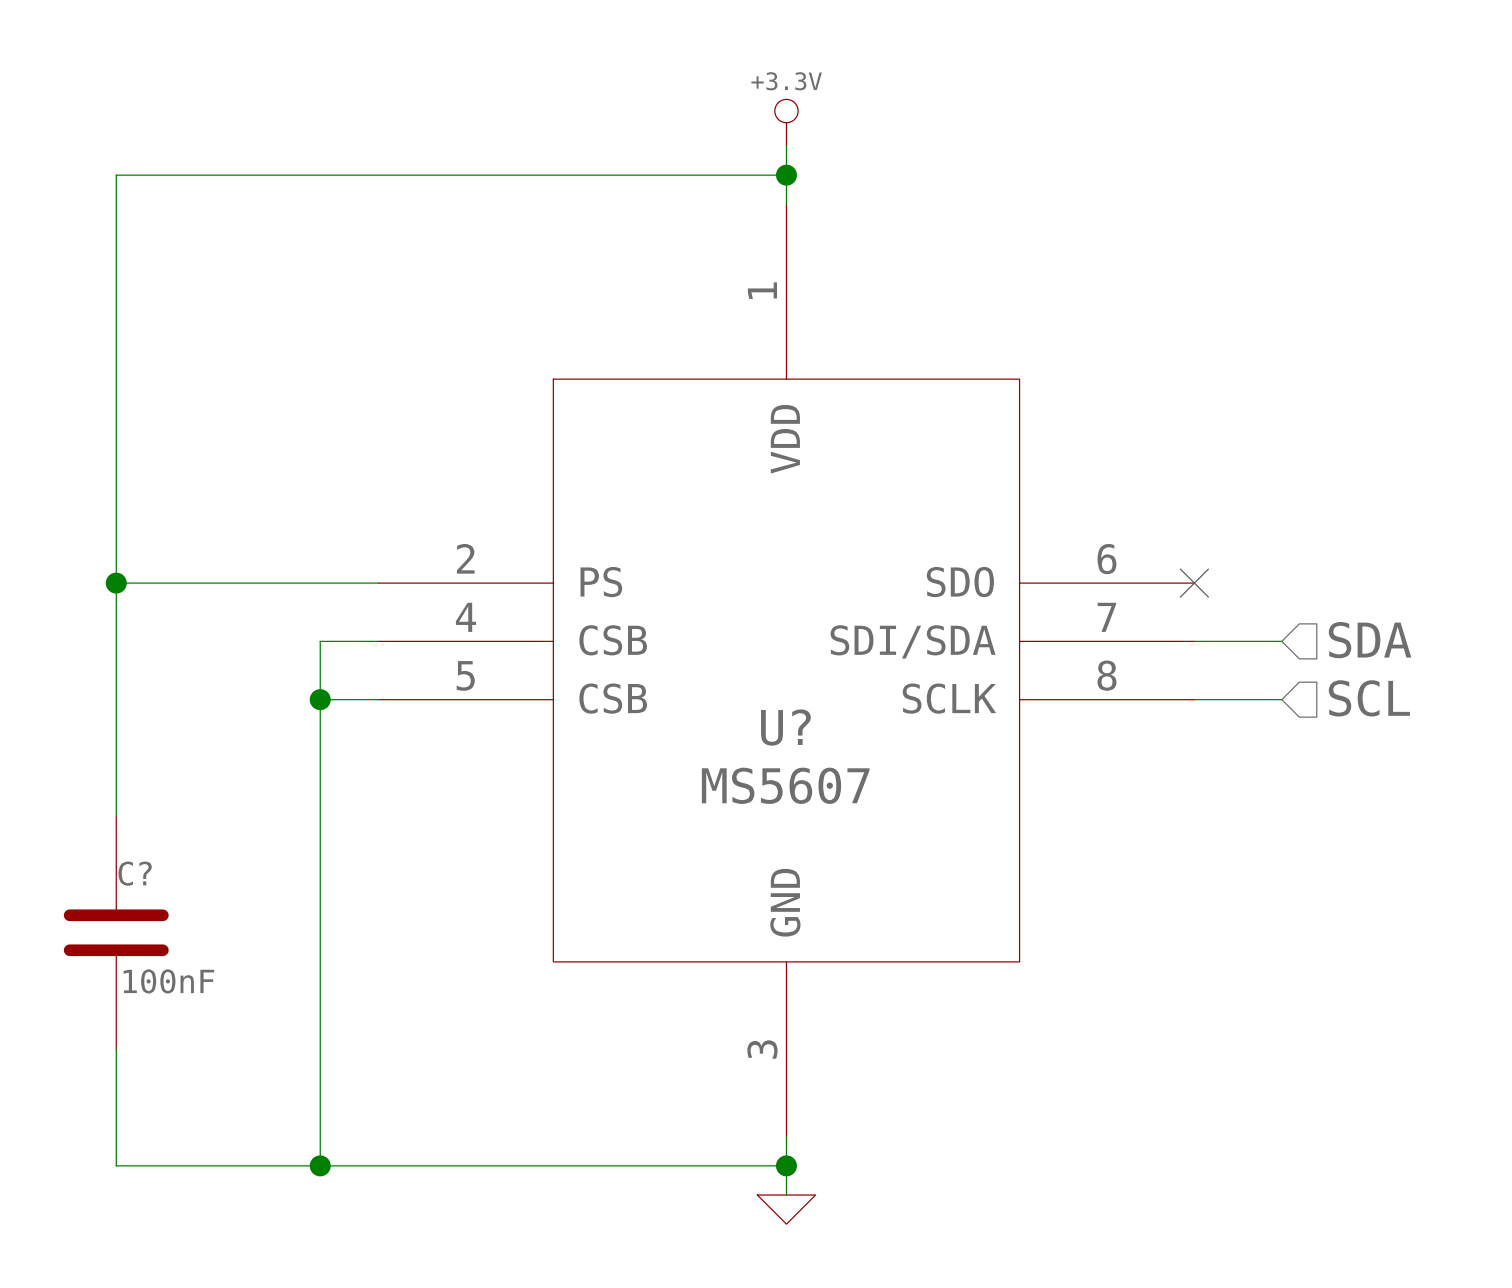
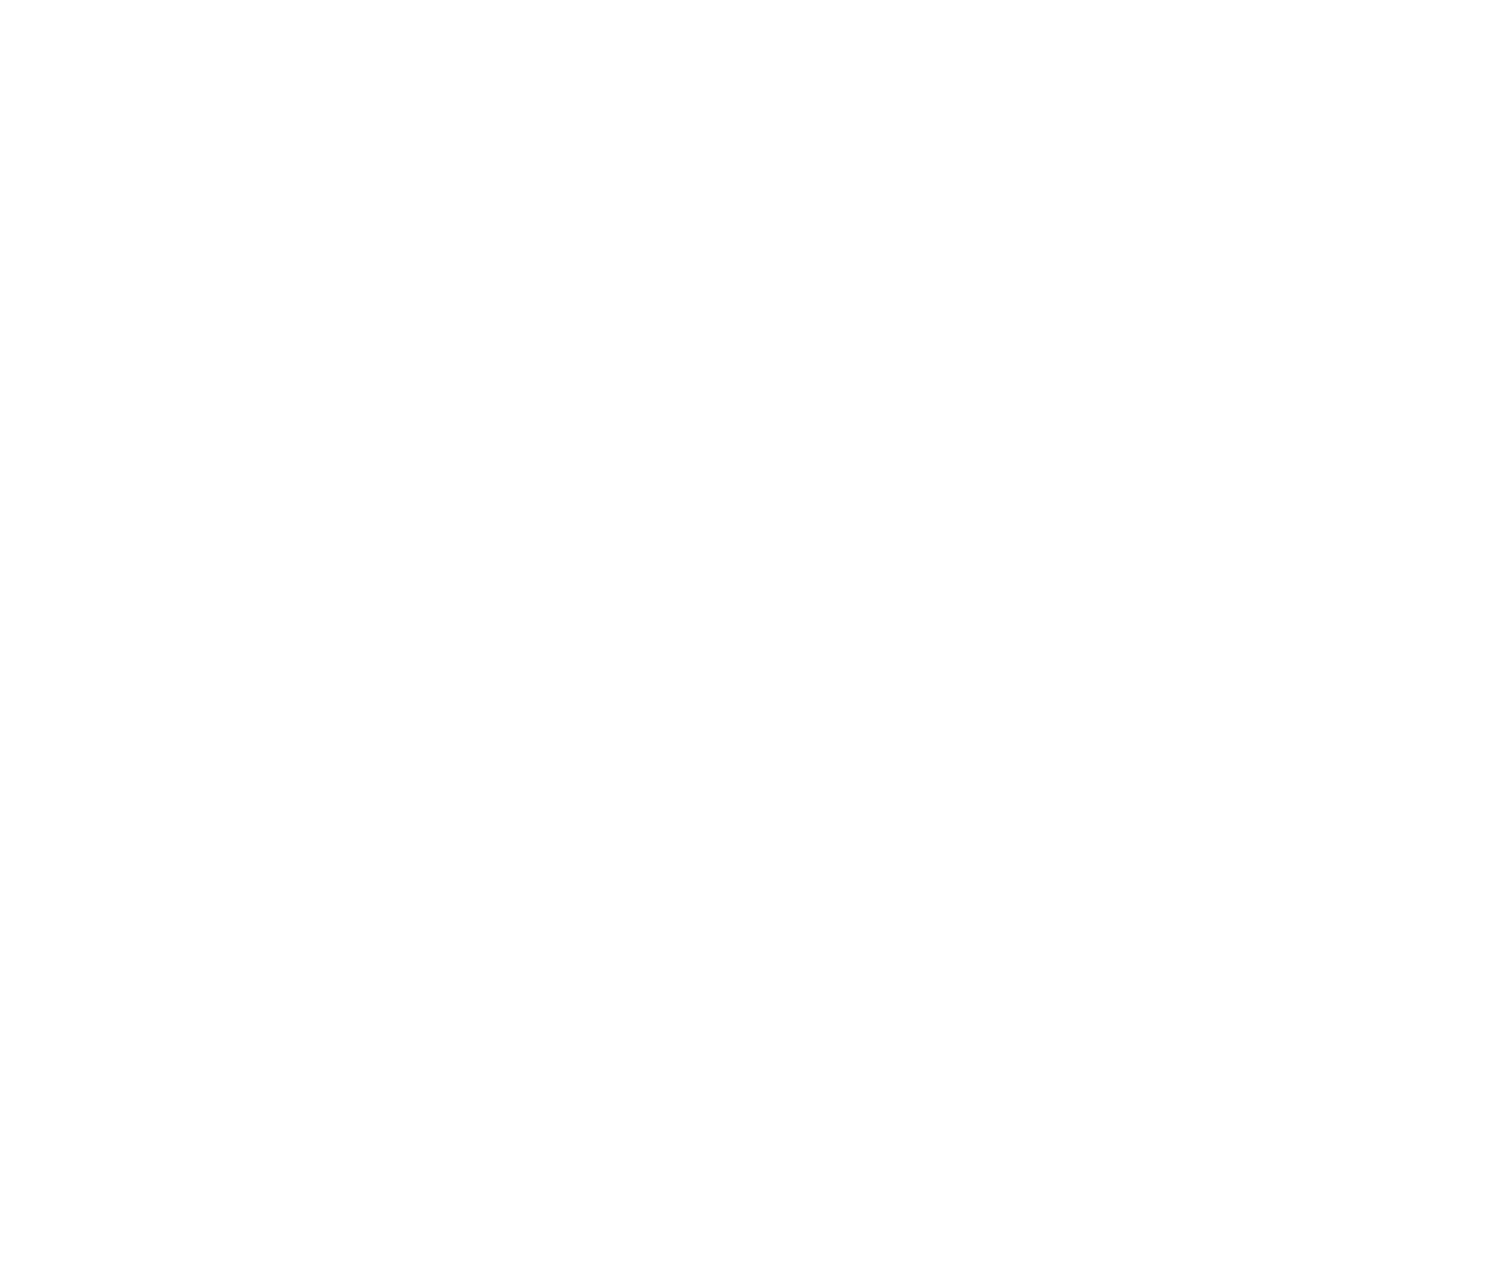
power symbol: +3.3V (786, 122) -> none
wire: (786, 146) (786, 204) -> none
wire: (786, 175) (116, 175) (116, 816) -> none
junction: (786, 175) -> none
wire: (116, 583) (378, 583) -> none
junction: (116, 583) -> none
no-connect mark: (1194, 583) -> none
hierarchical label: SDA (1370, 640) -> none
wire: (378, 641) (320, 641) (320, 1165) -> none
wire: (1194, 641) (1281, 641) -> none
U?: MS5607 (786, 670) -> none
hierarchical label: SCL (1369, 698) -> none
wire: (320, 699) (378, 699) -> none
junction: (320, 699) -> none
wire: (1194, 699) (1281, 699) -> none
C?: 100nF (116, 932) -> none
wire: (116, 1049) (116, 1165) (786, 1165) -> none
wire: (786, 1136) (786, 1195) -> none
junction: (320, 1165) -> none
junction: (786, 1165) -> none
power symbol: (786, 1209) -> none

